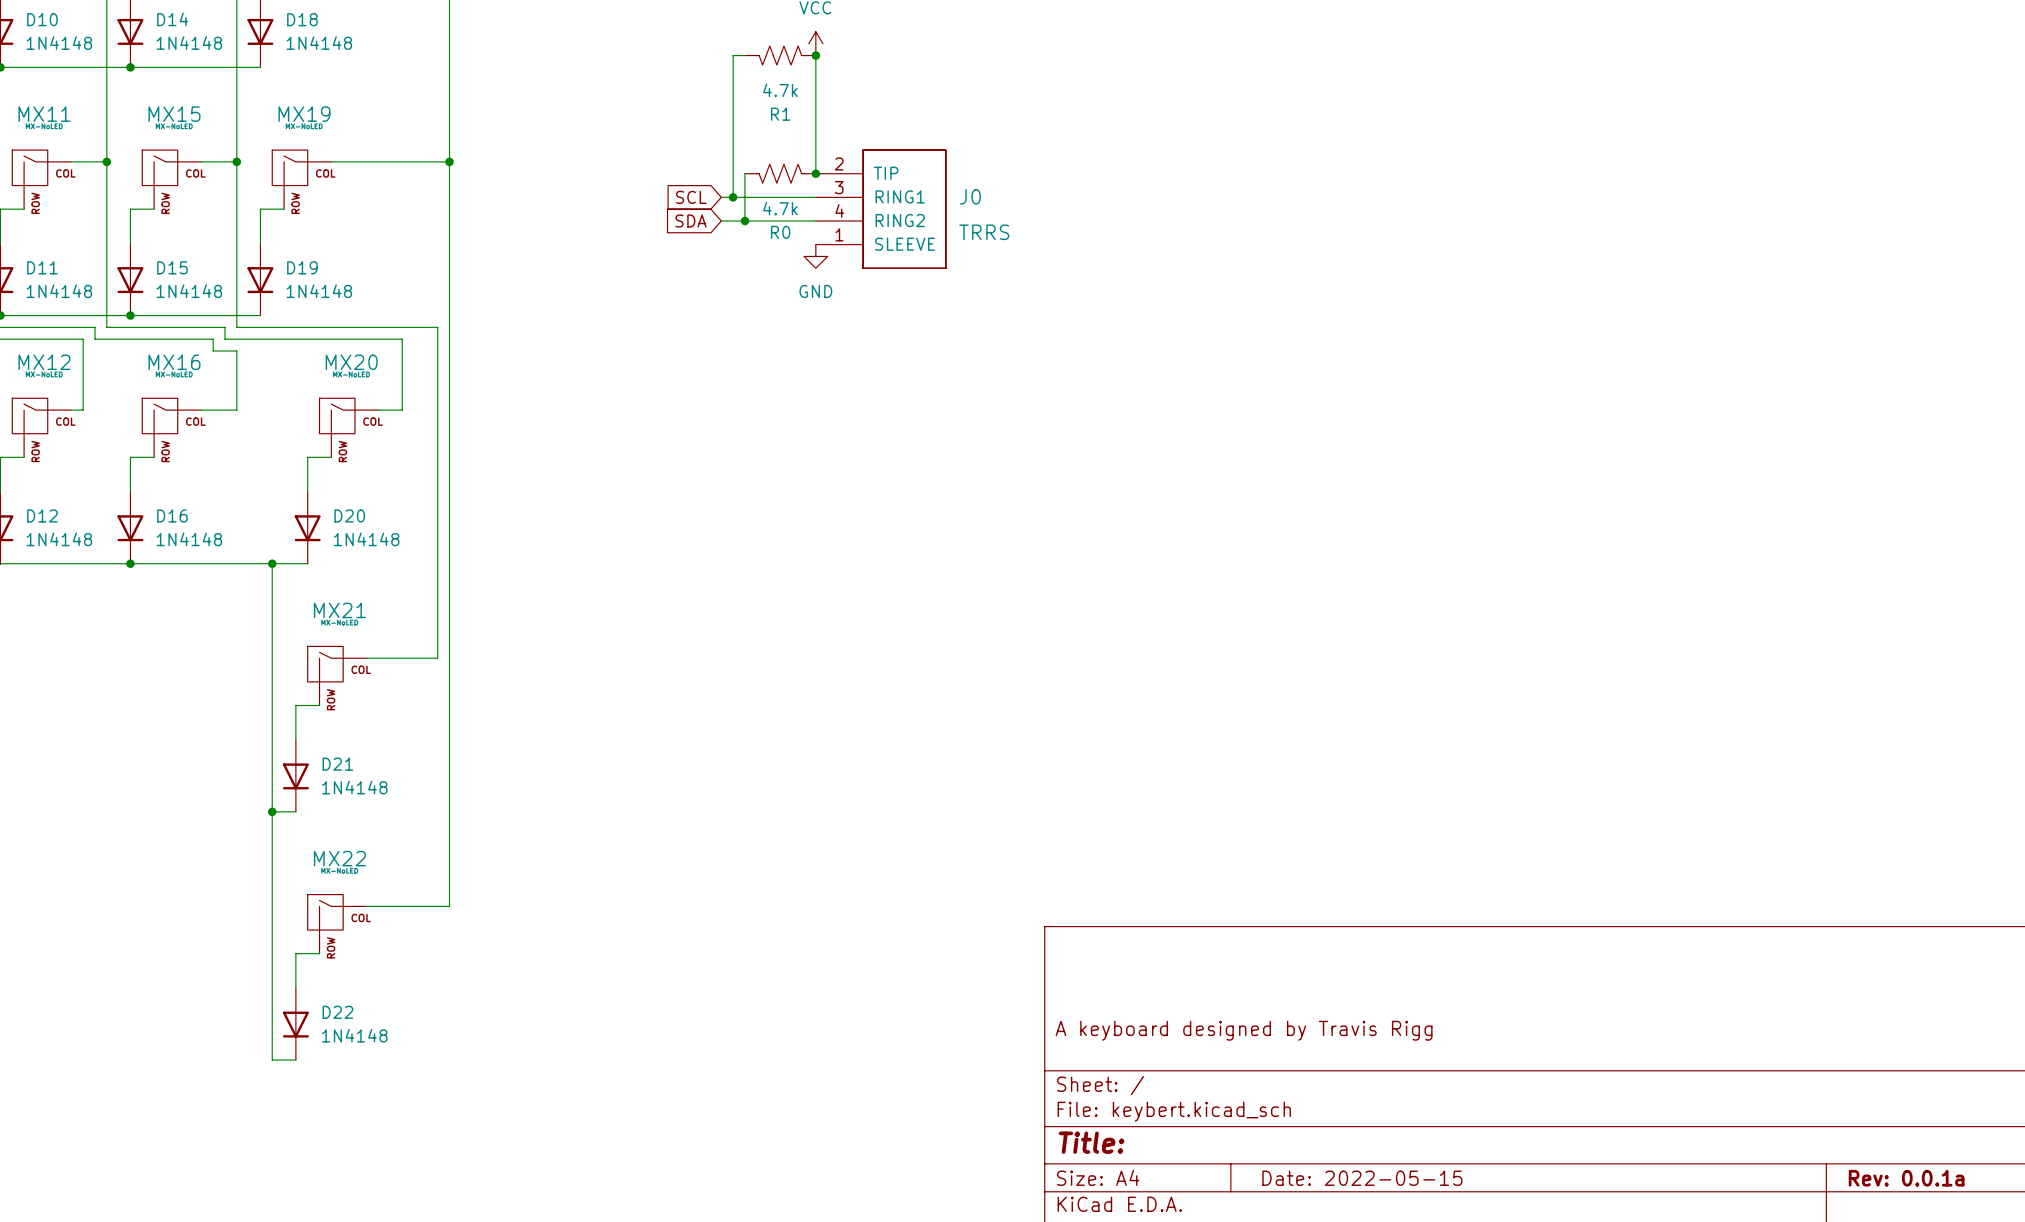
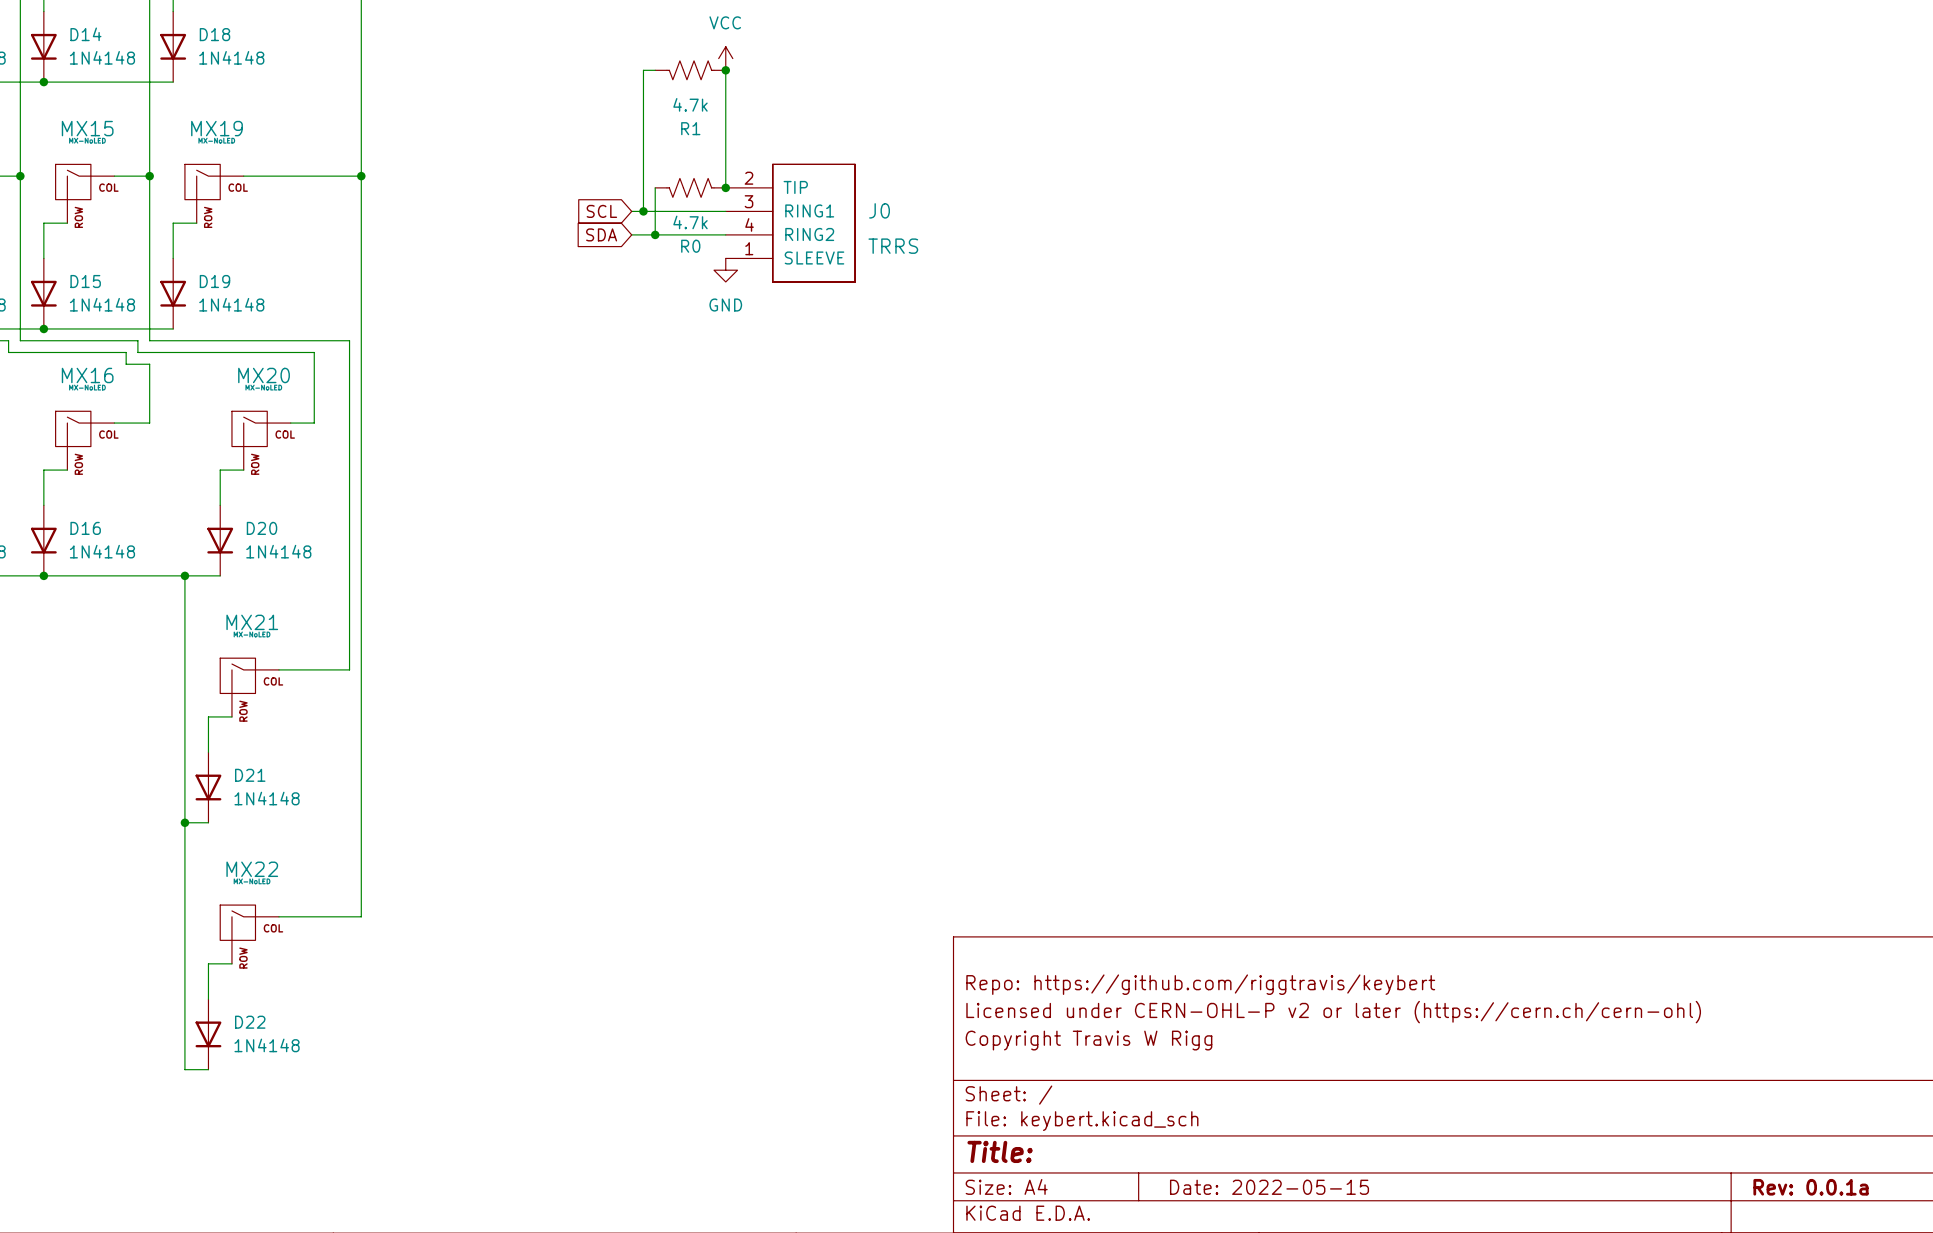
title block: none -> Repo: https://github.com/riggtravis/keybert (1200, 984)
title block: none -> Licensed under CERN-OHL-P v2 or later (https://cern.ch/cern-ohl) (1333, 1012)
title block: A keyboard designed by Travis Rigg (1244, 1030) -> Copyright Travis W Rigg (1088, 1040)

